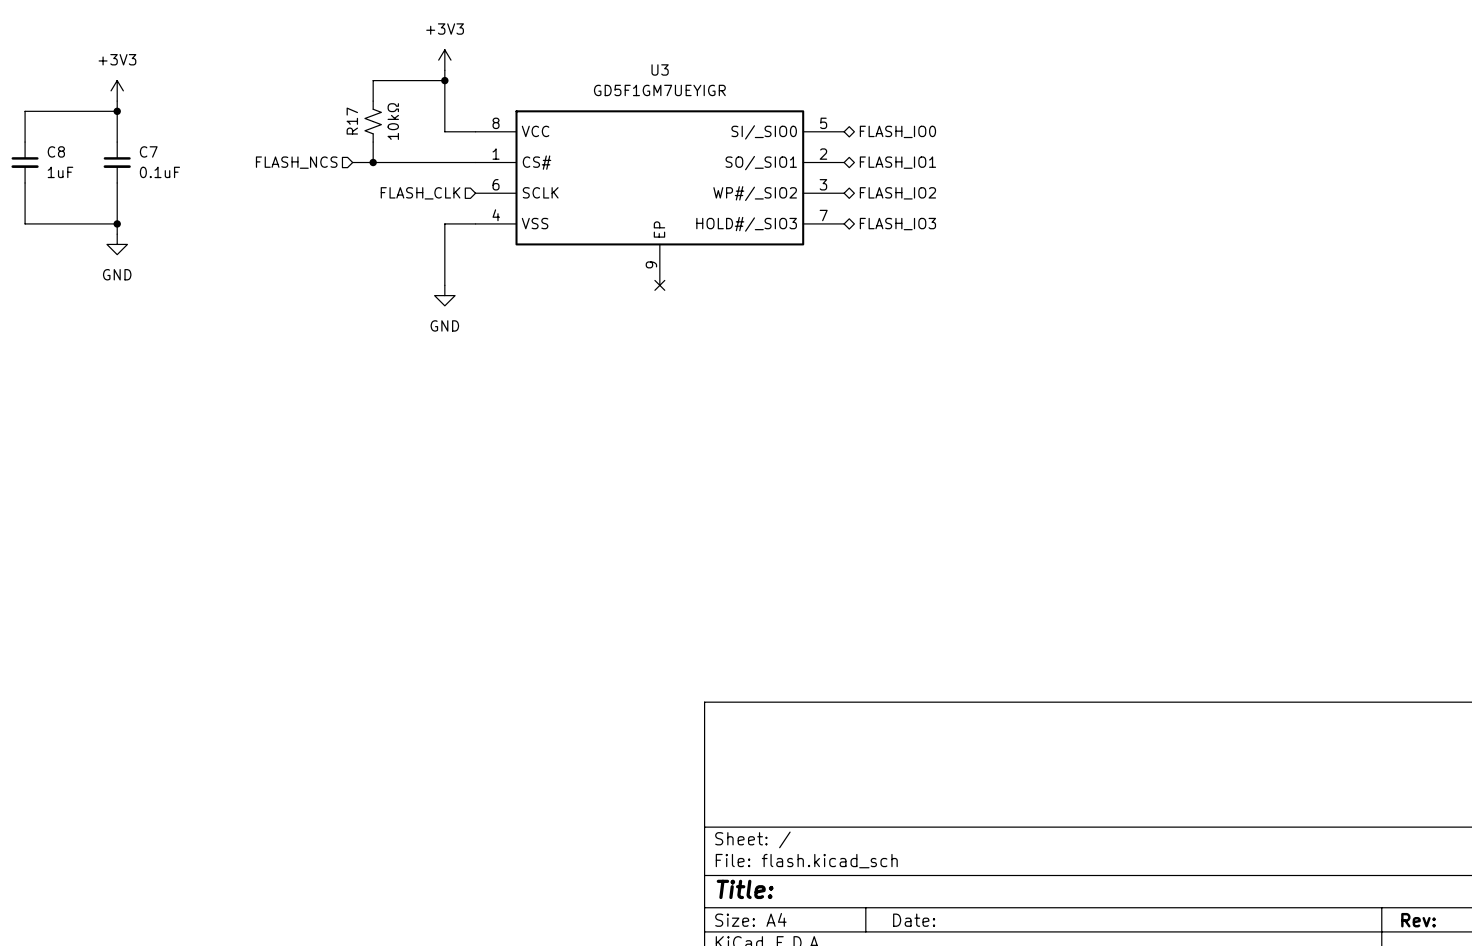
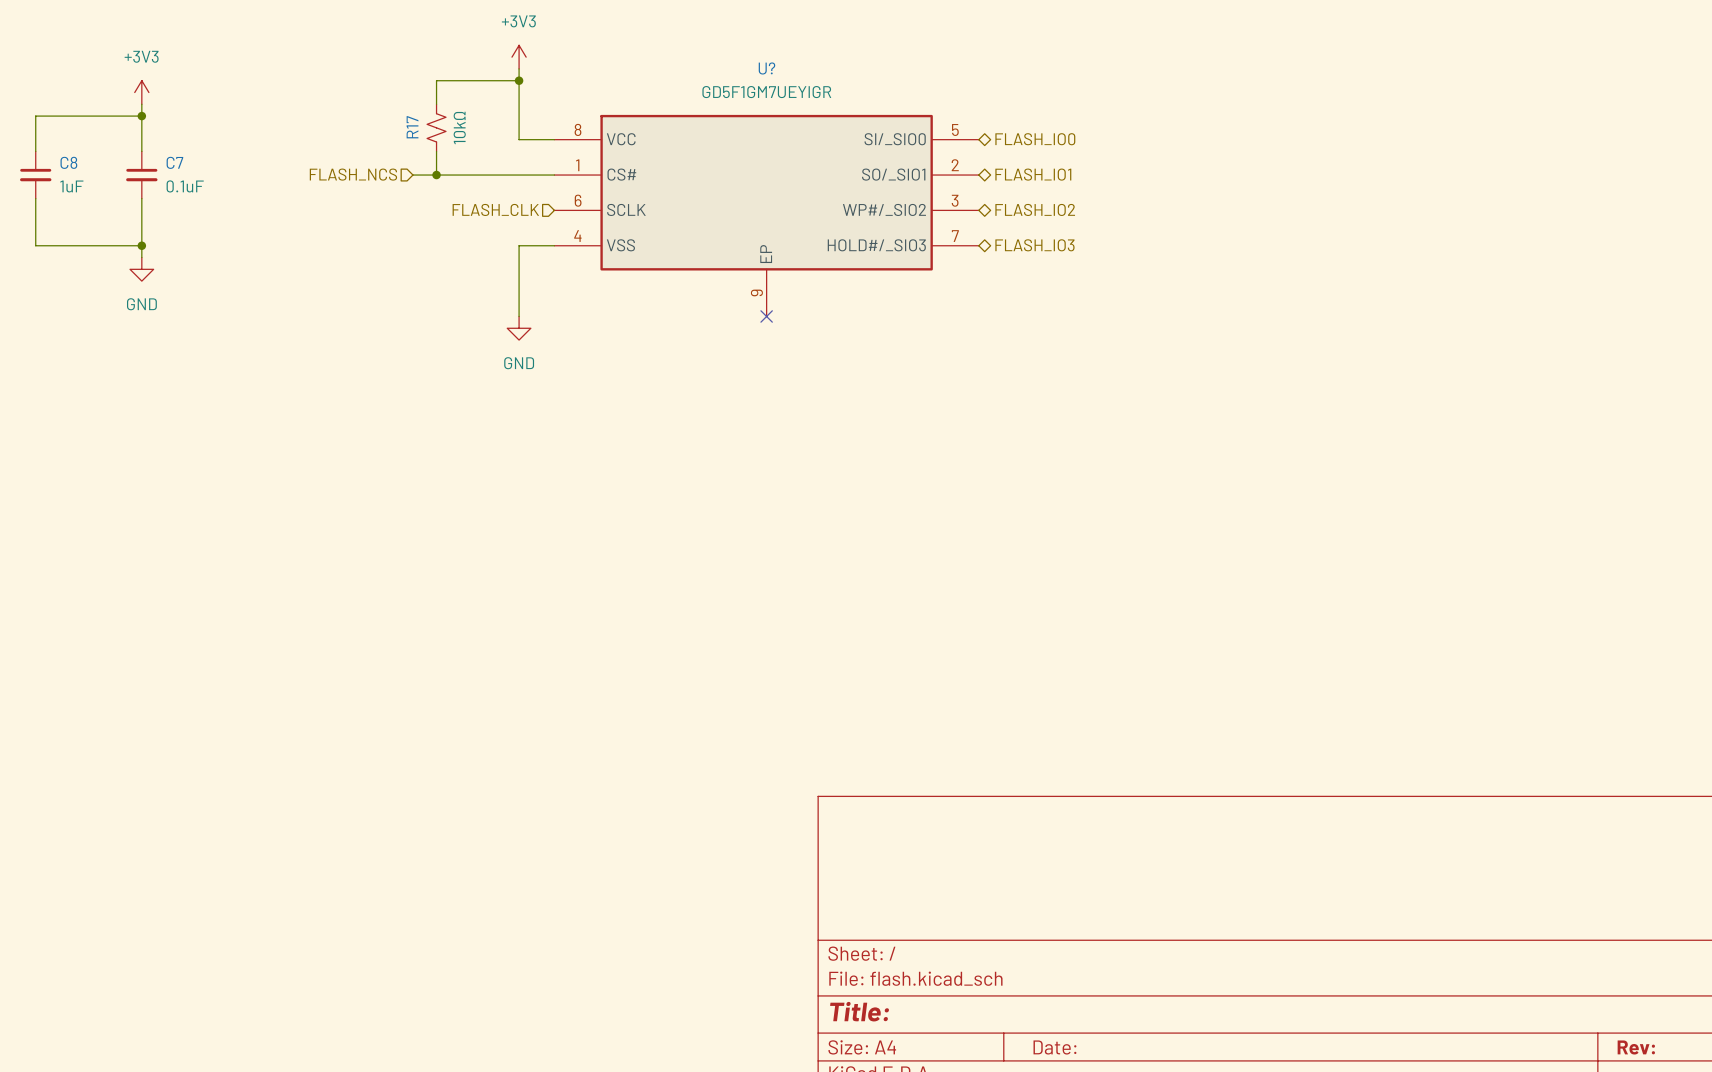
U3 name: U3 (660, 69) -> U? (766, 68)

